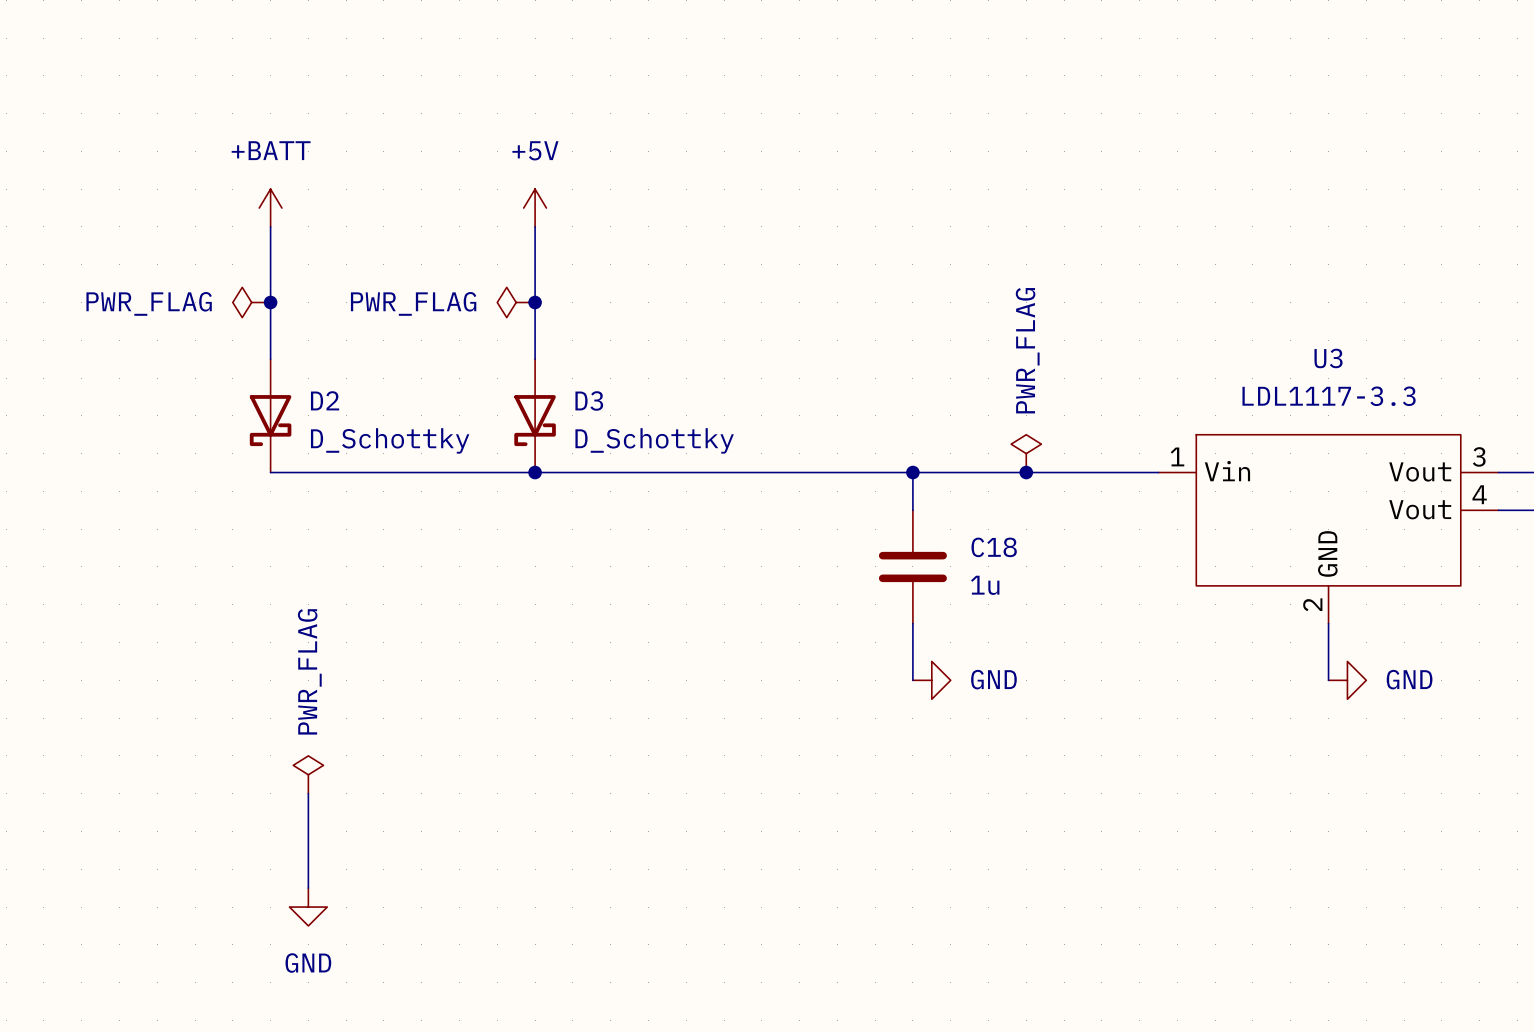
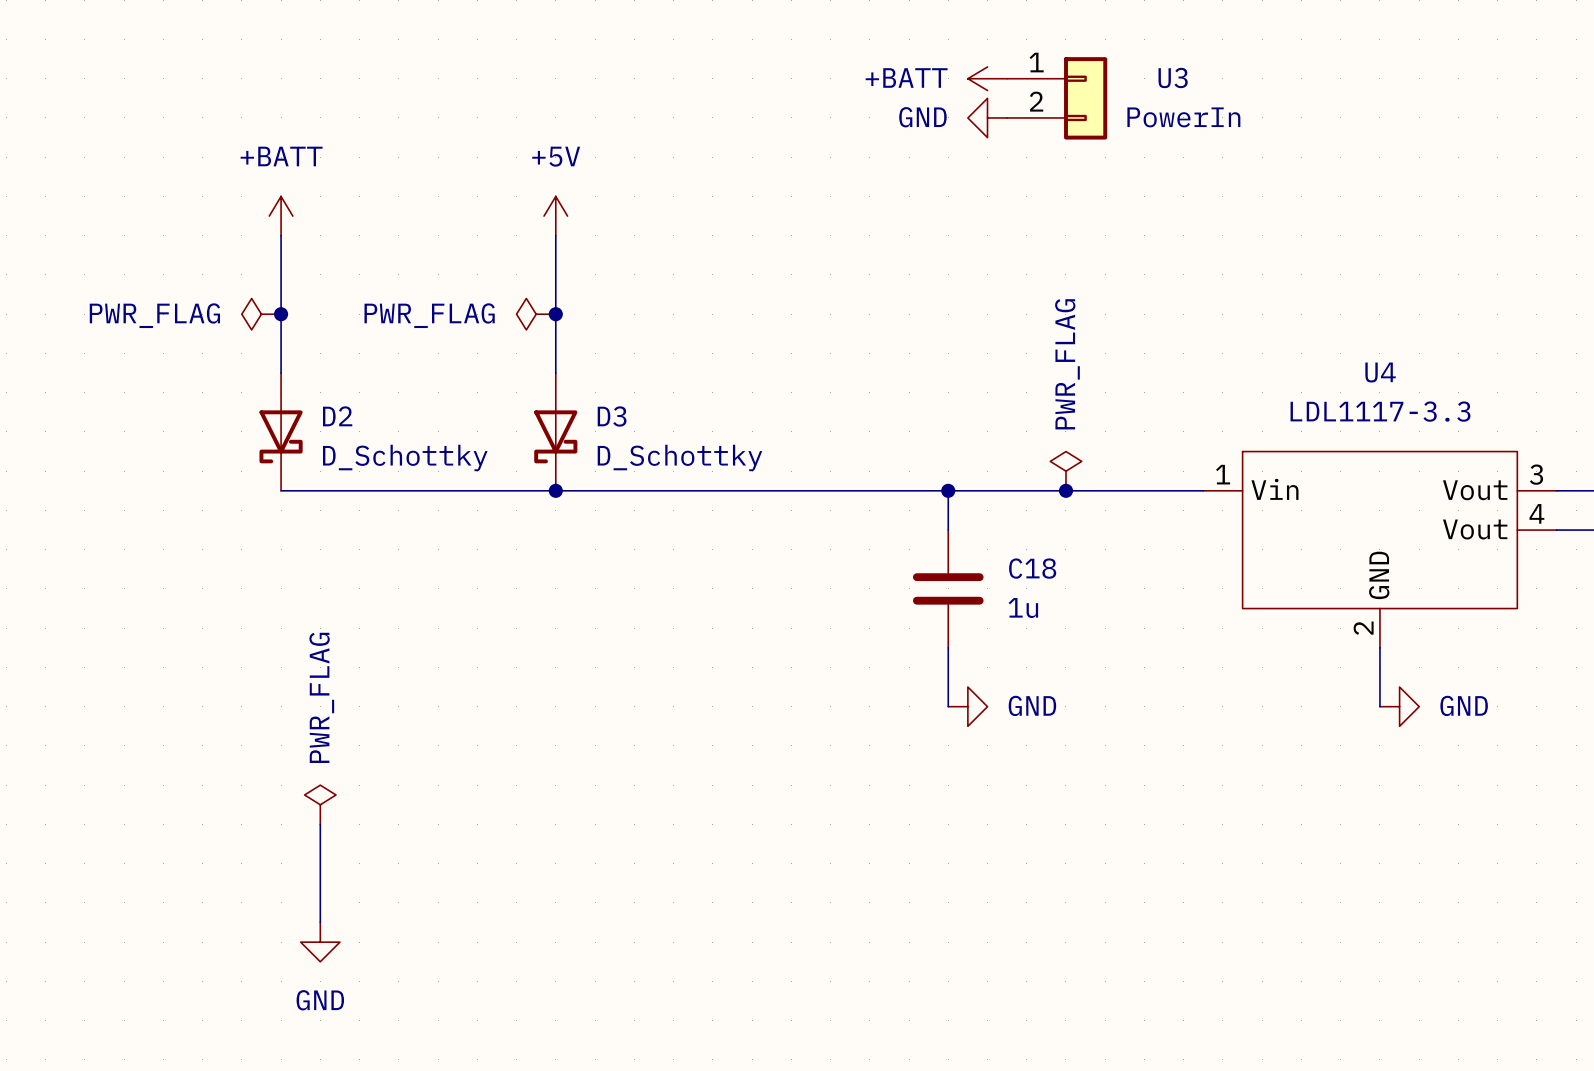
power symbol: none -> +BATT (987, 78)
U3: none -> PowerIn (1057, 98)
power symbol: none -> GND (987, 117)
U3 name: U3 (1328, 358) -> U4 (1380, 372)

